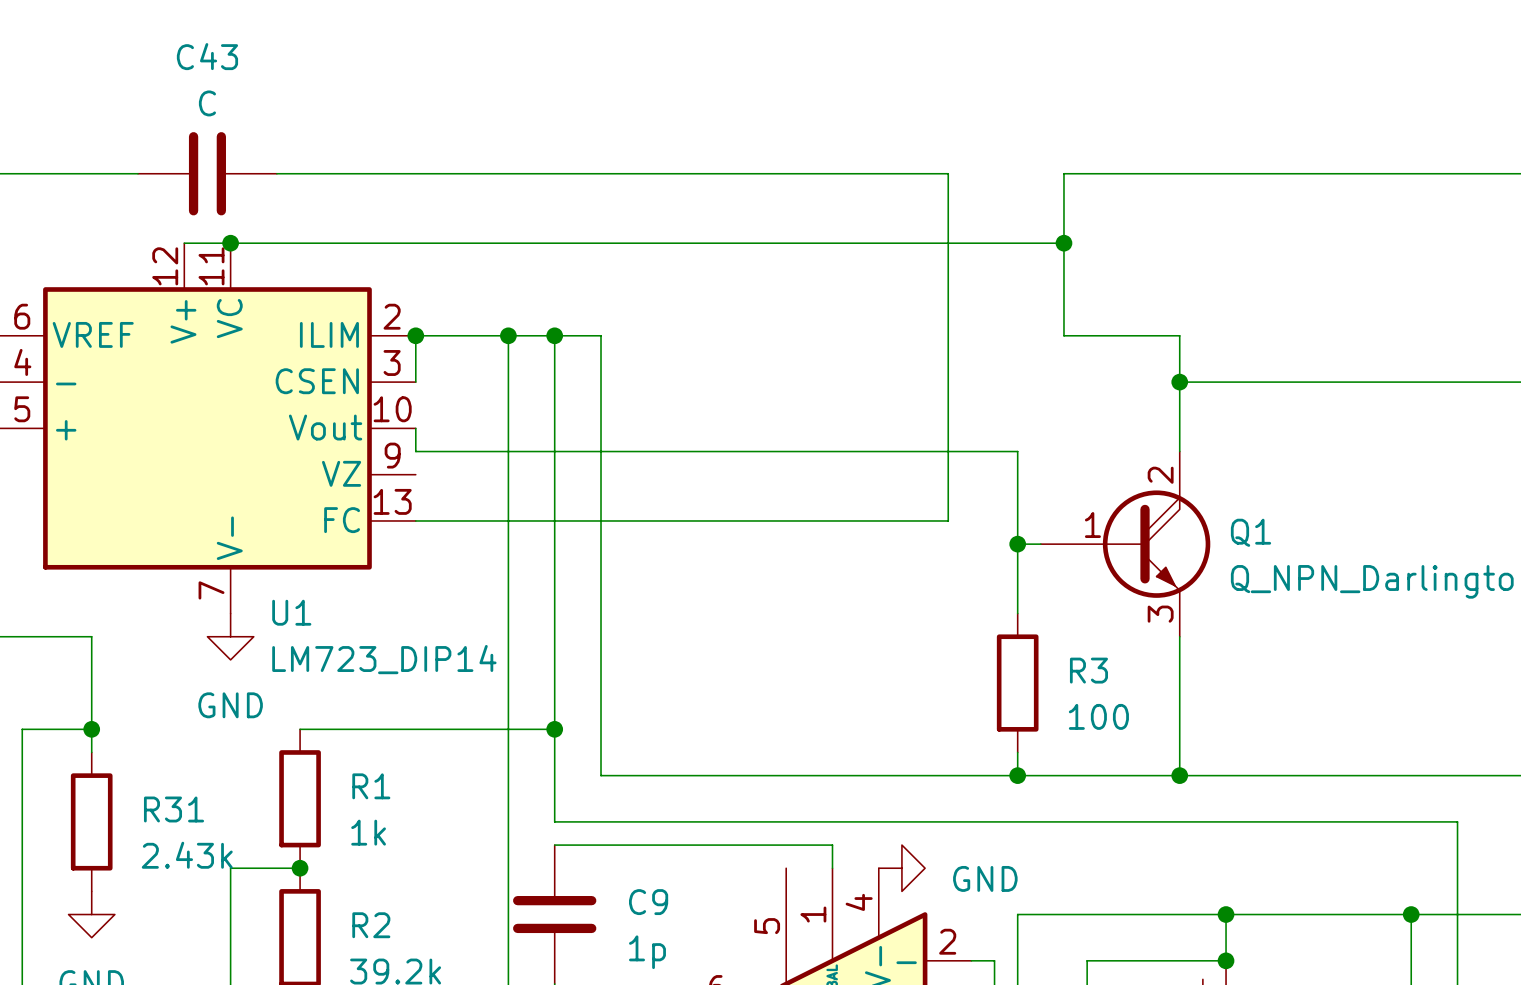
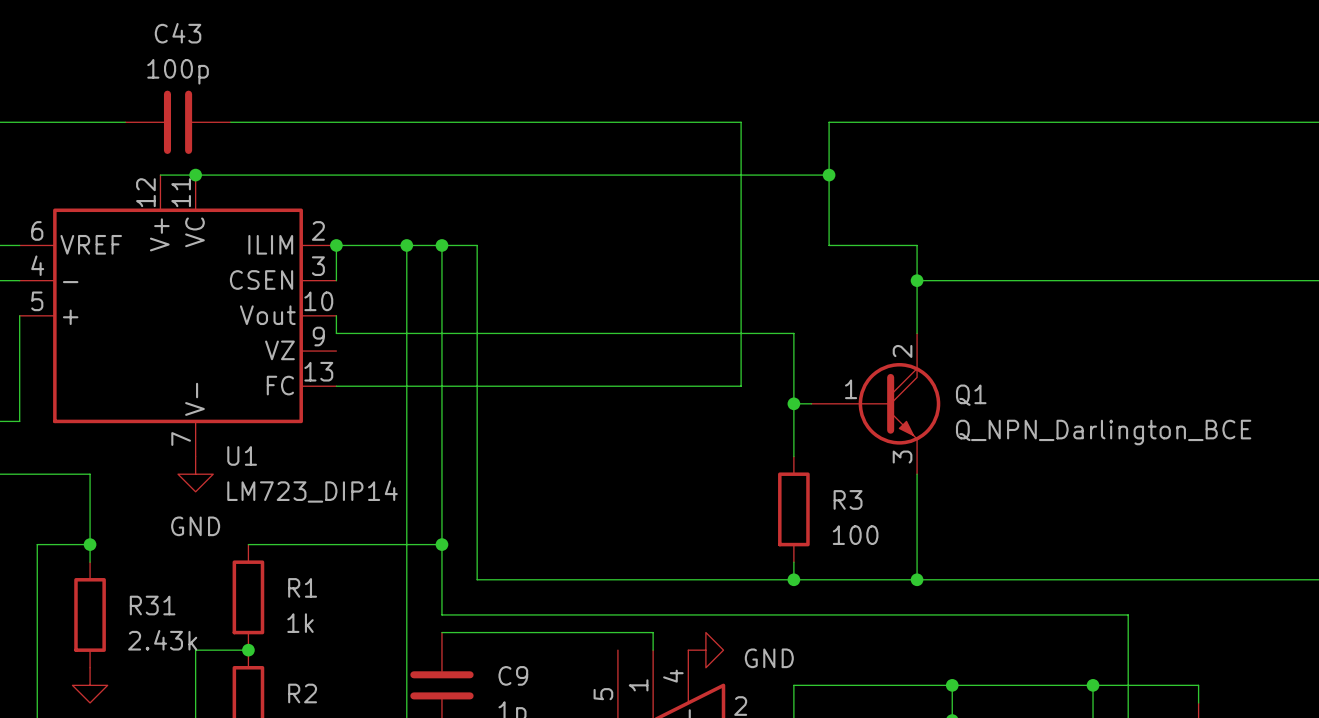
C43 value: C (207, 103) -> 100p (178, 71)

